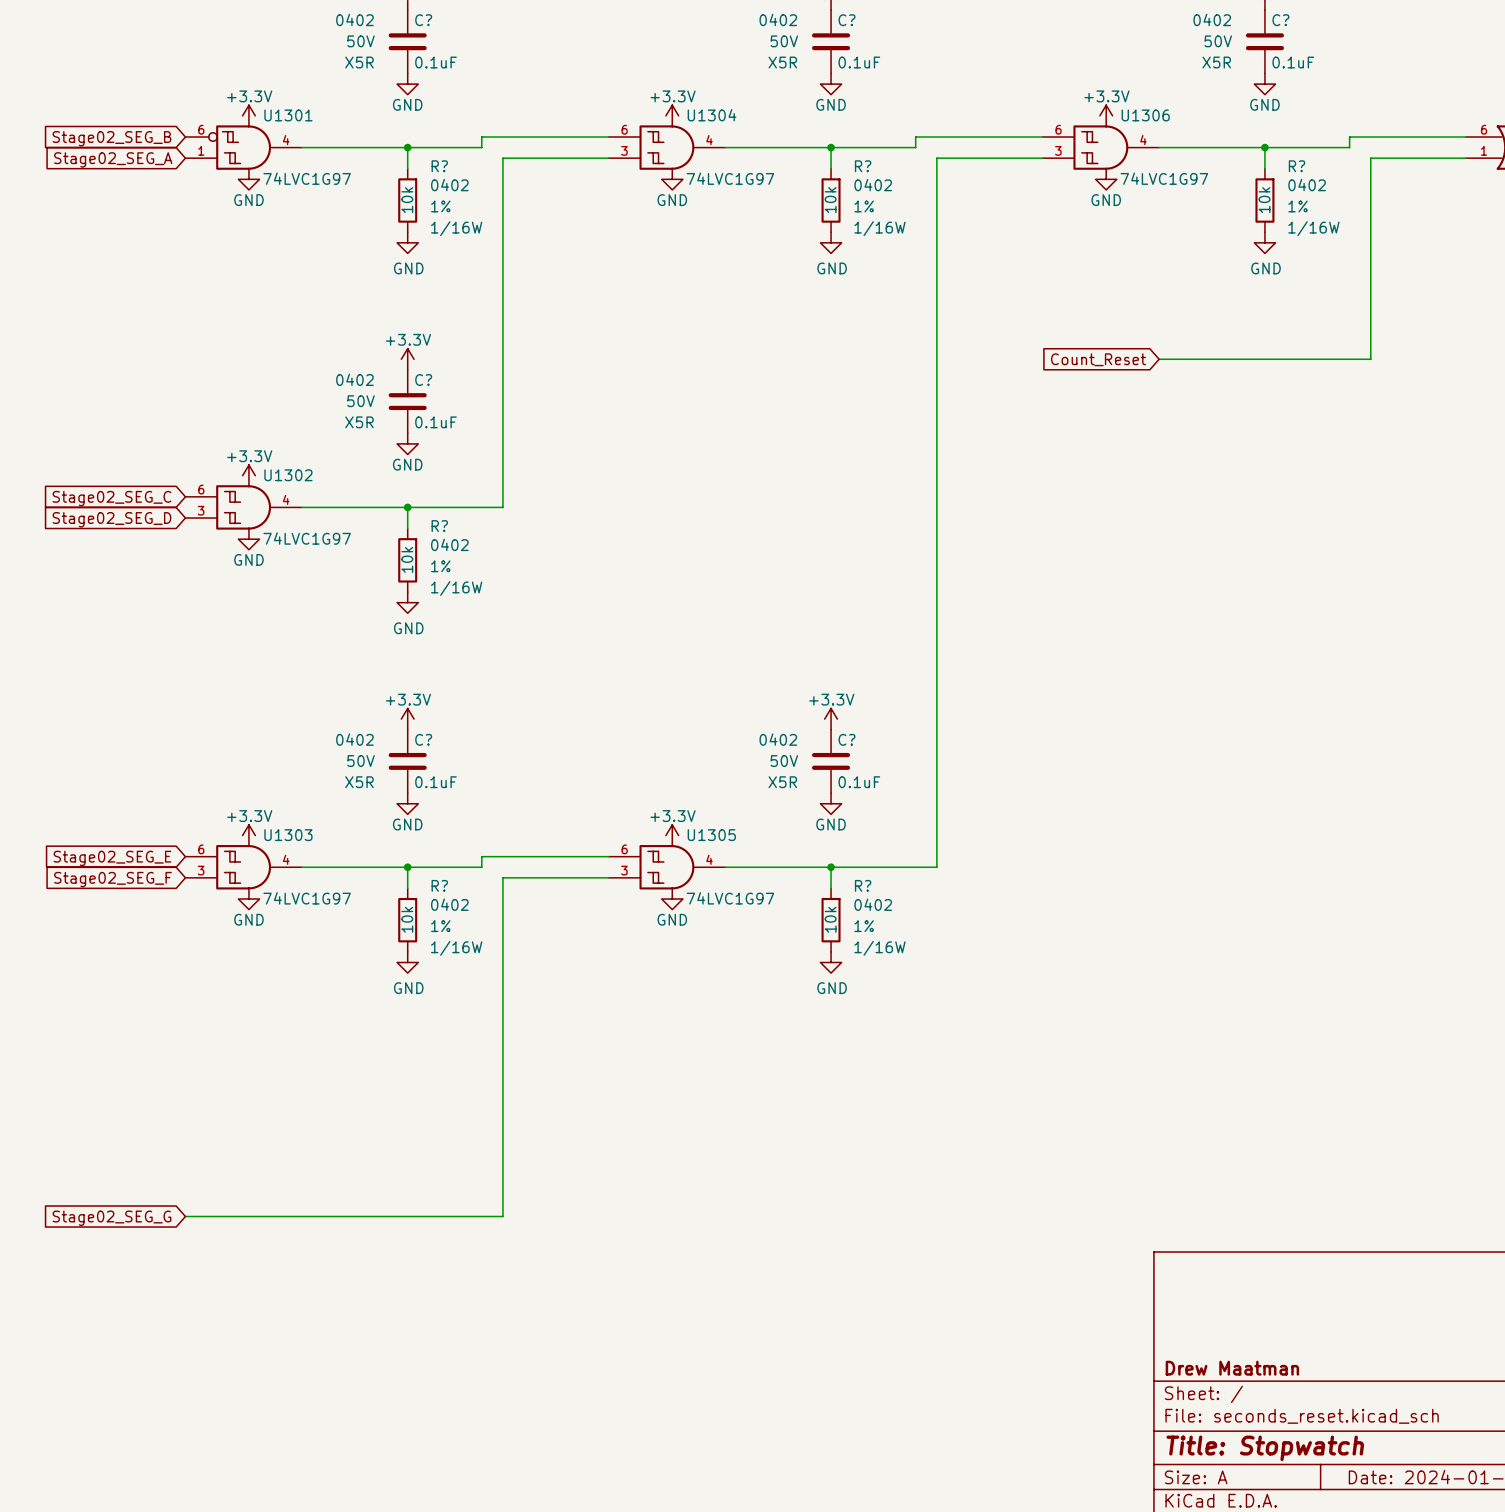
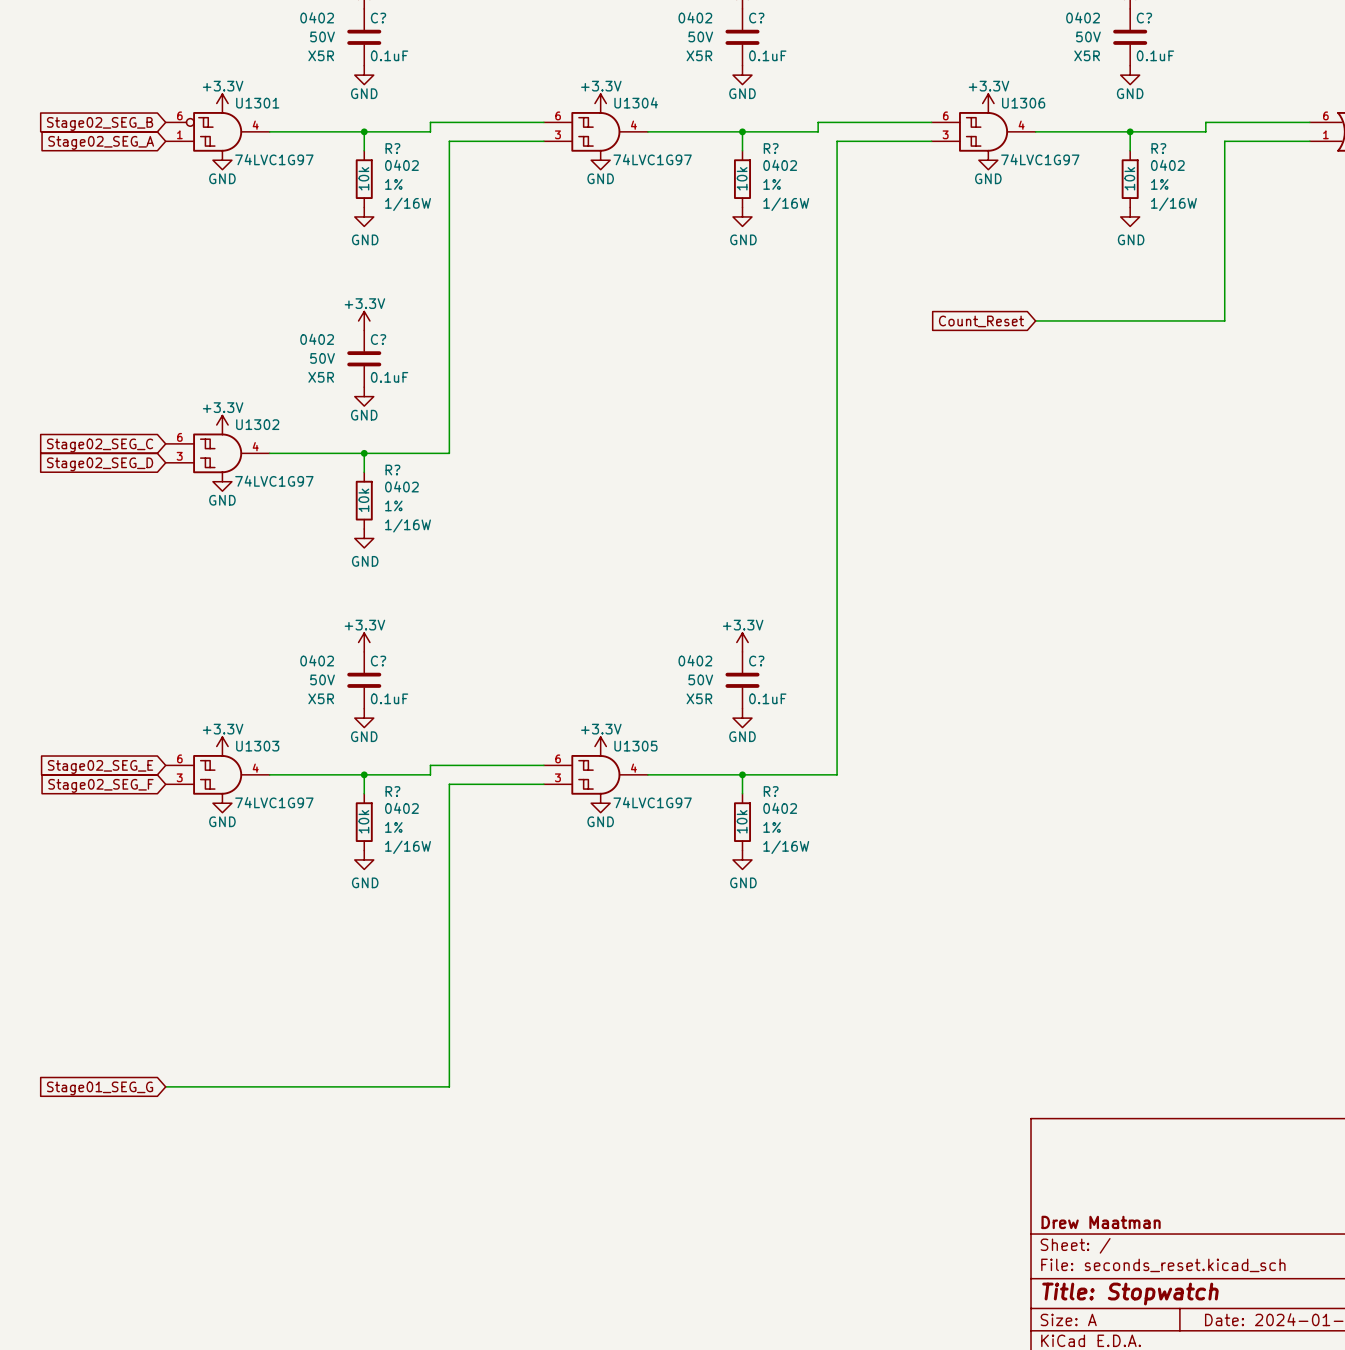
global label: Stage02_SEG_G (111, 1218) -> Stage01_SEG_G (100, 1088)

